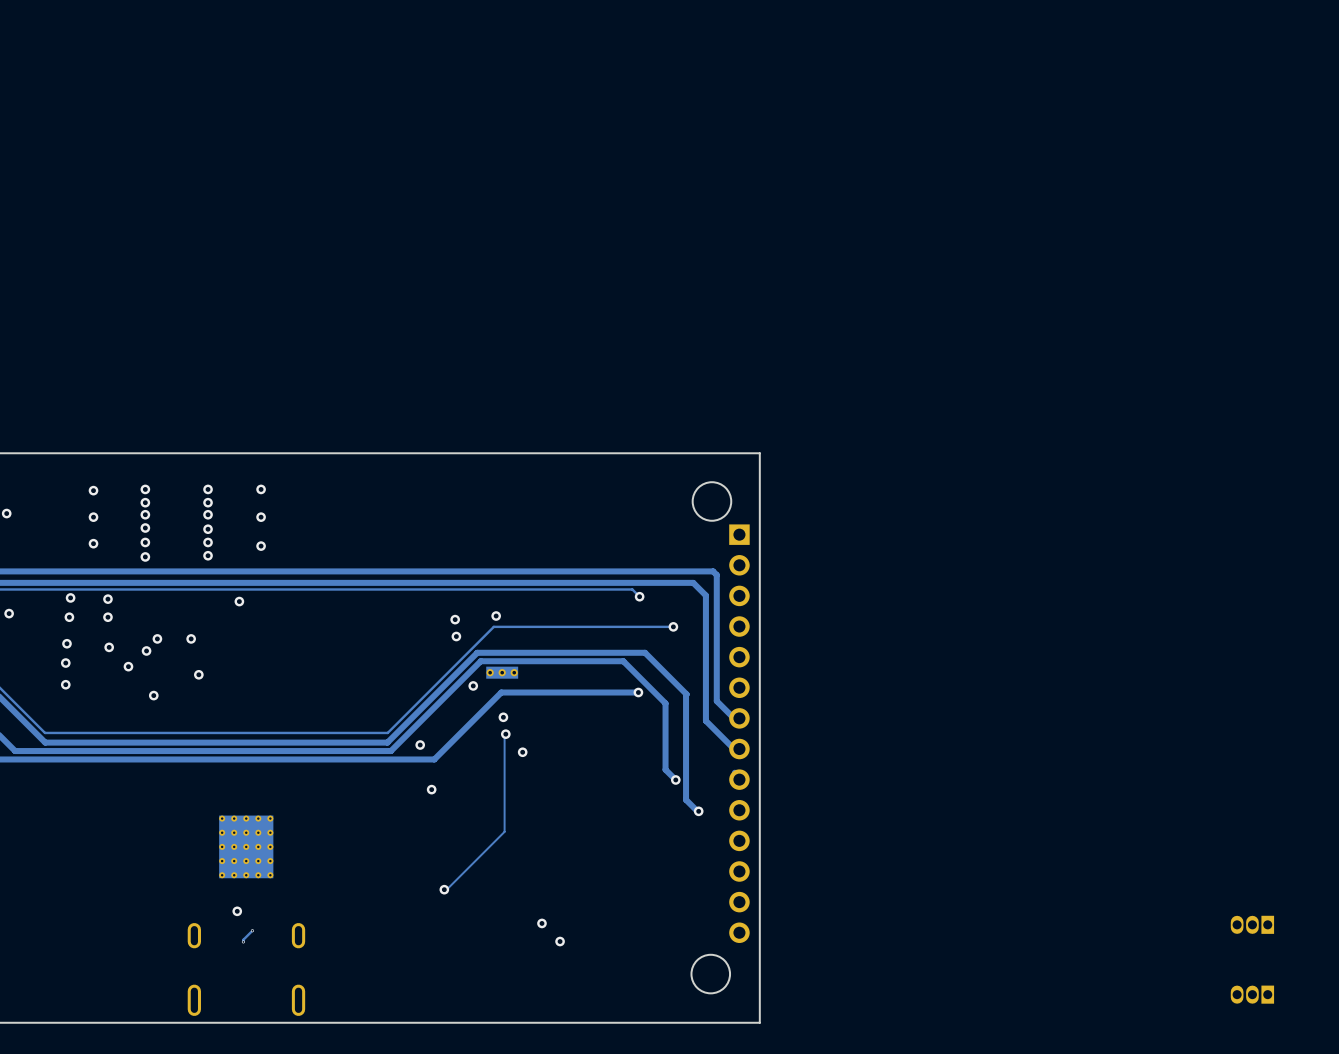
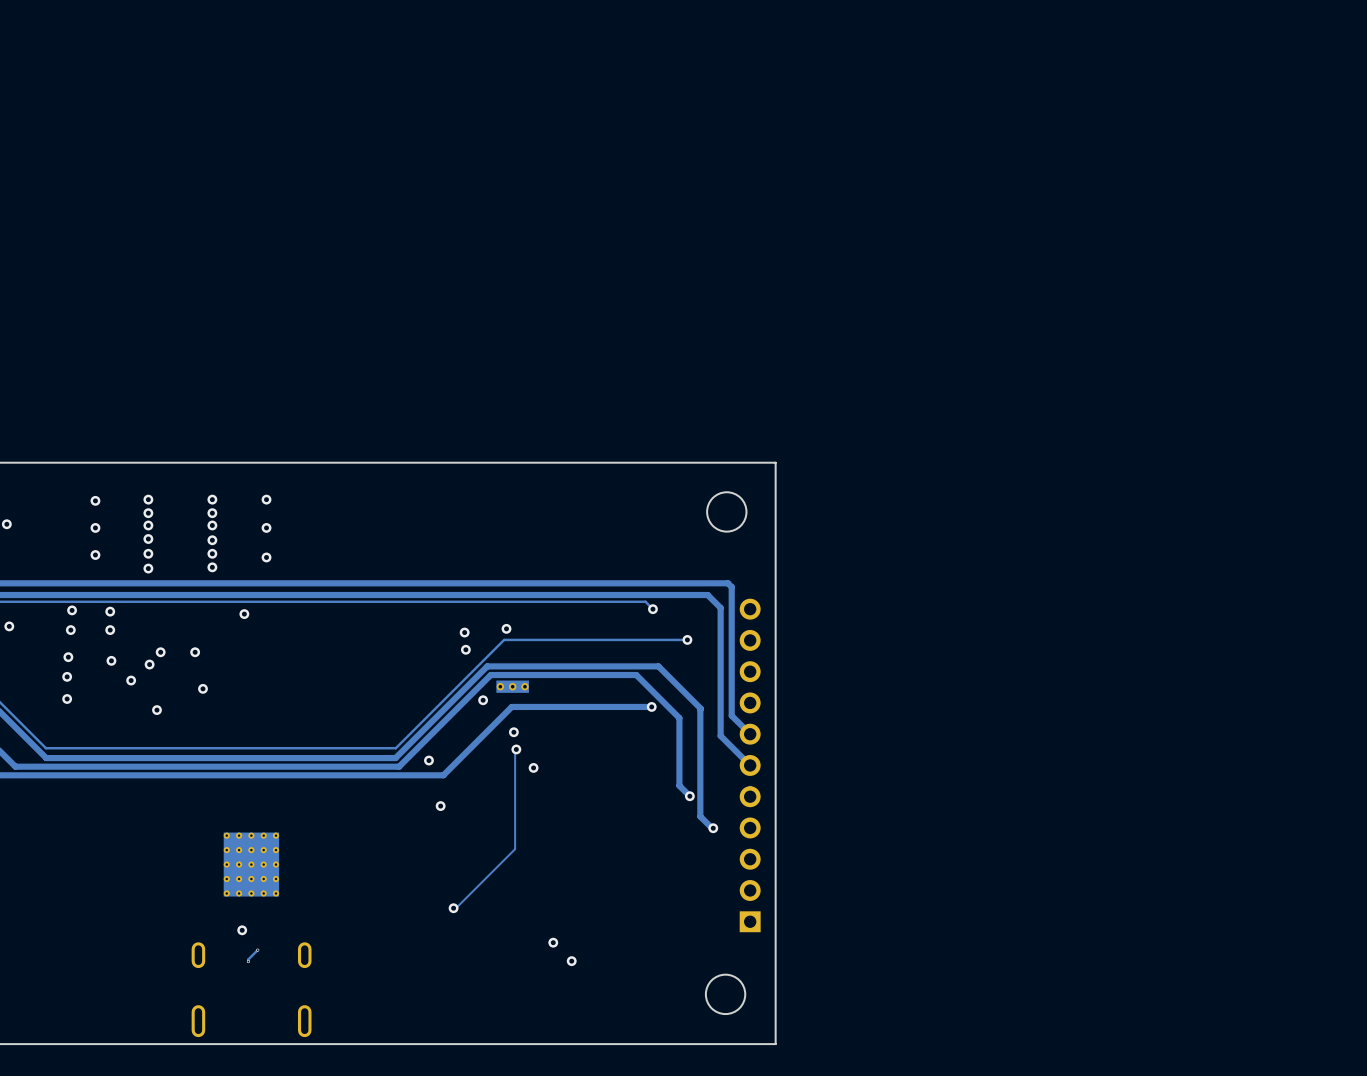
part: (739, 733) -> none
part: none -> (750, 765)
part: (1252, 924) -> none
part: (1252, 994) -> none

